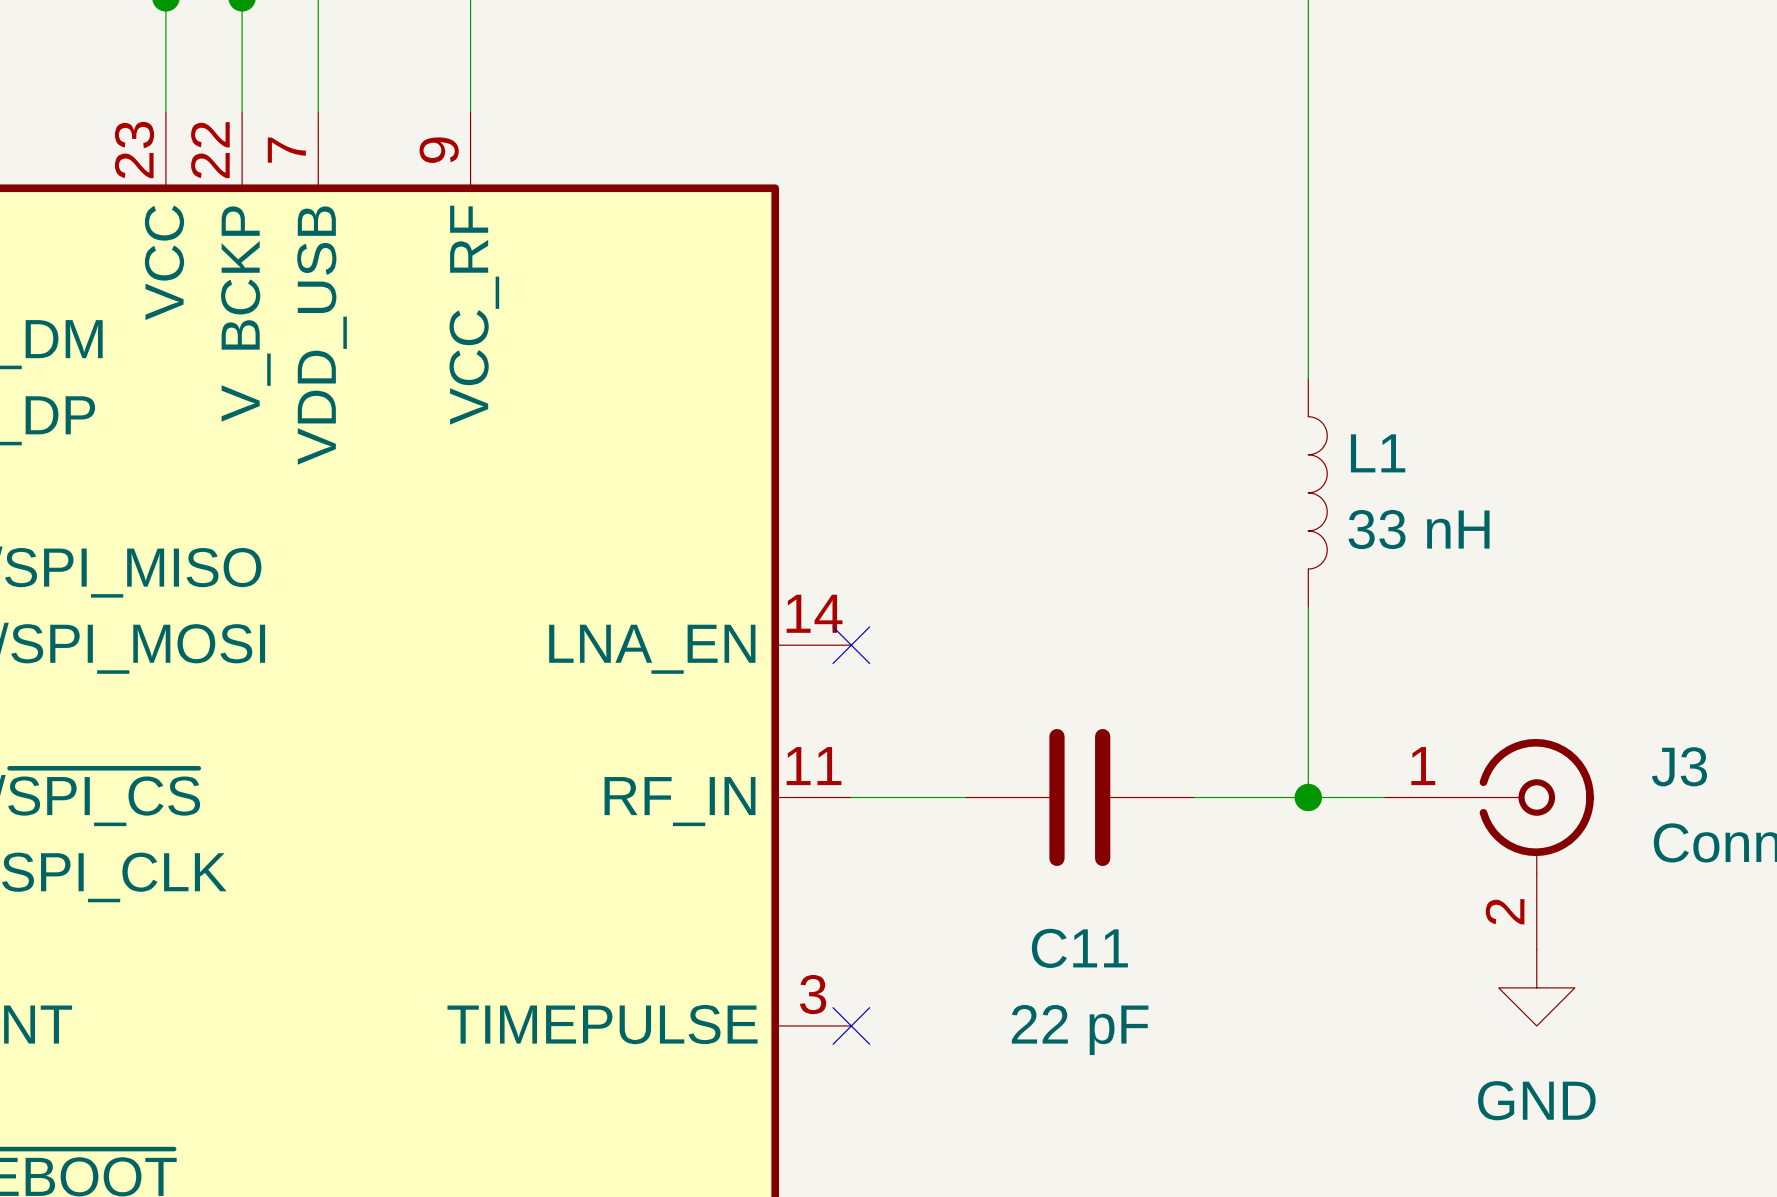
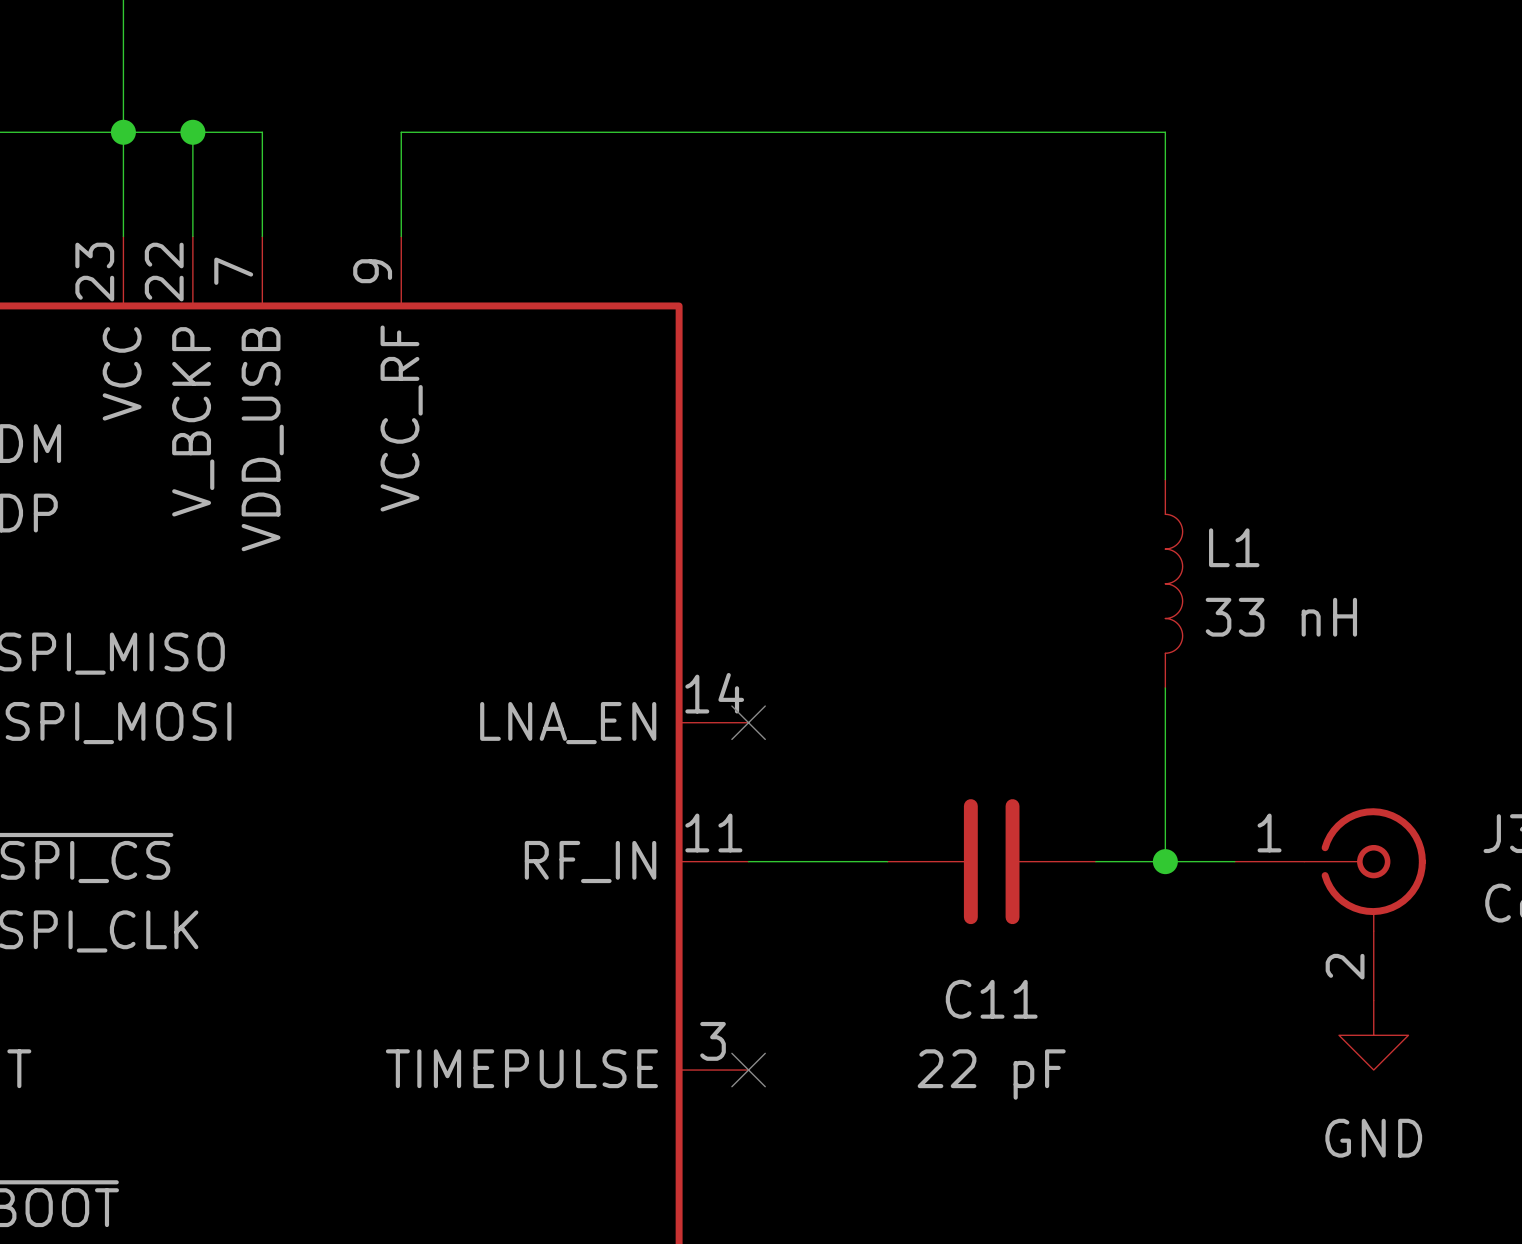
C11 position: (1079, 797) -> (991, 861)

